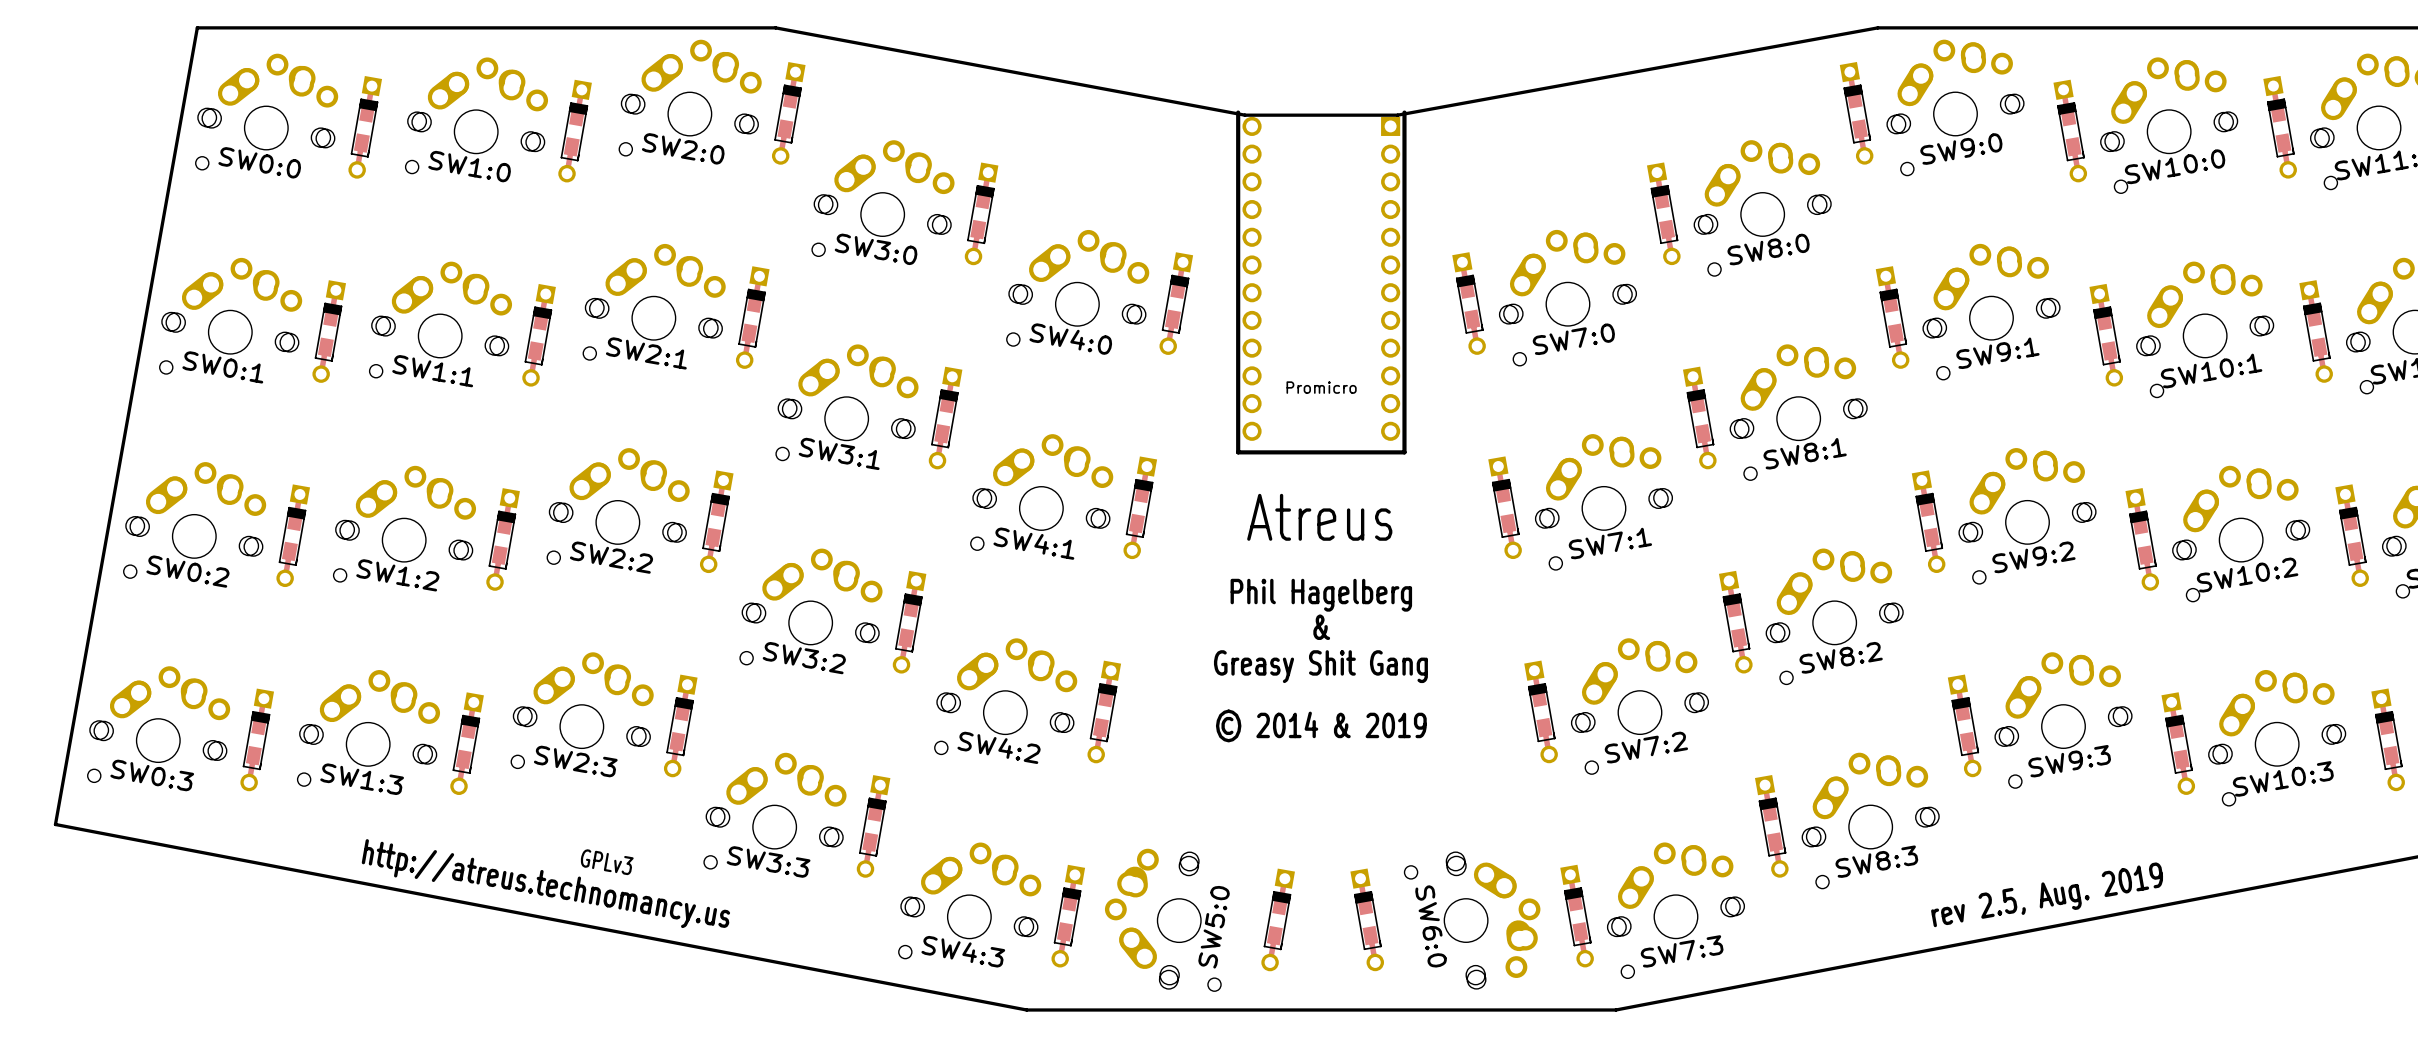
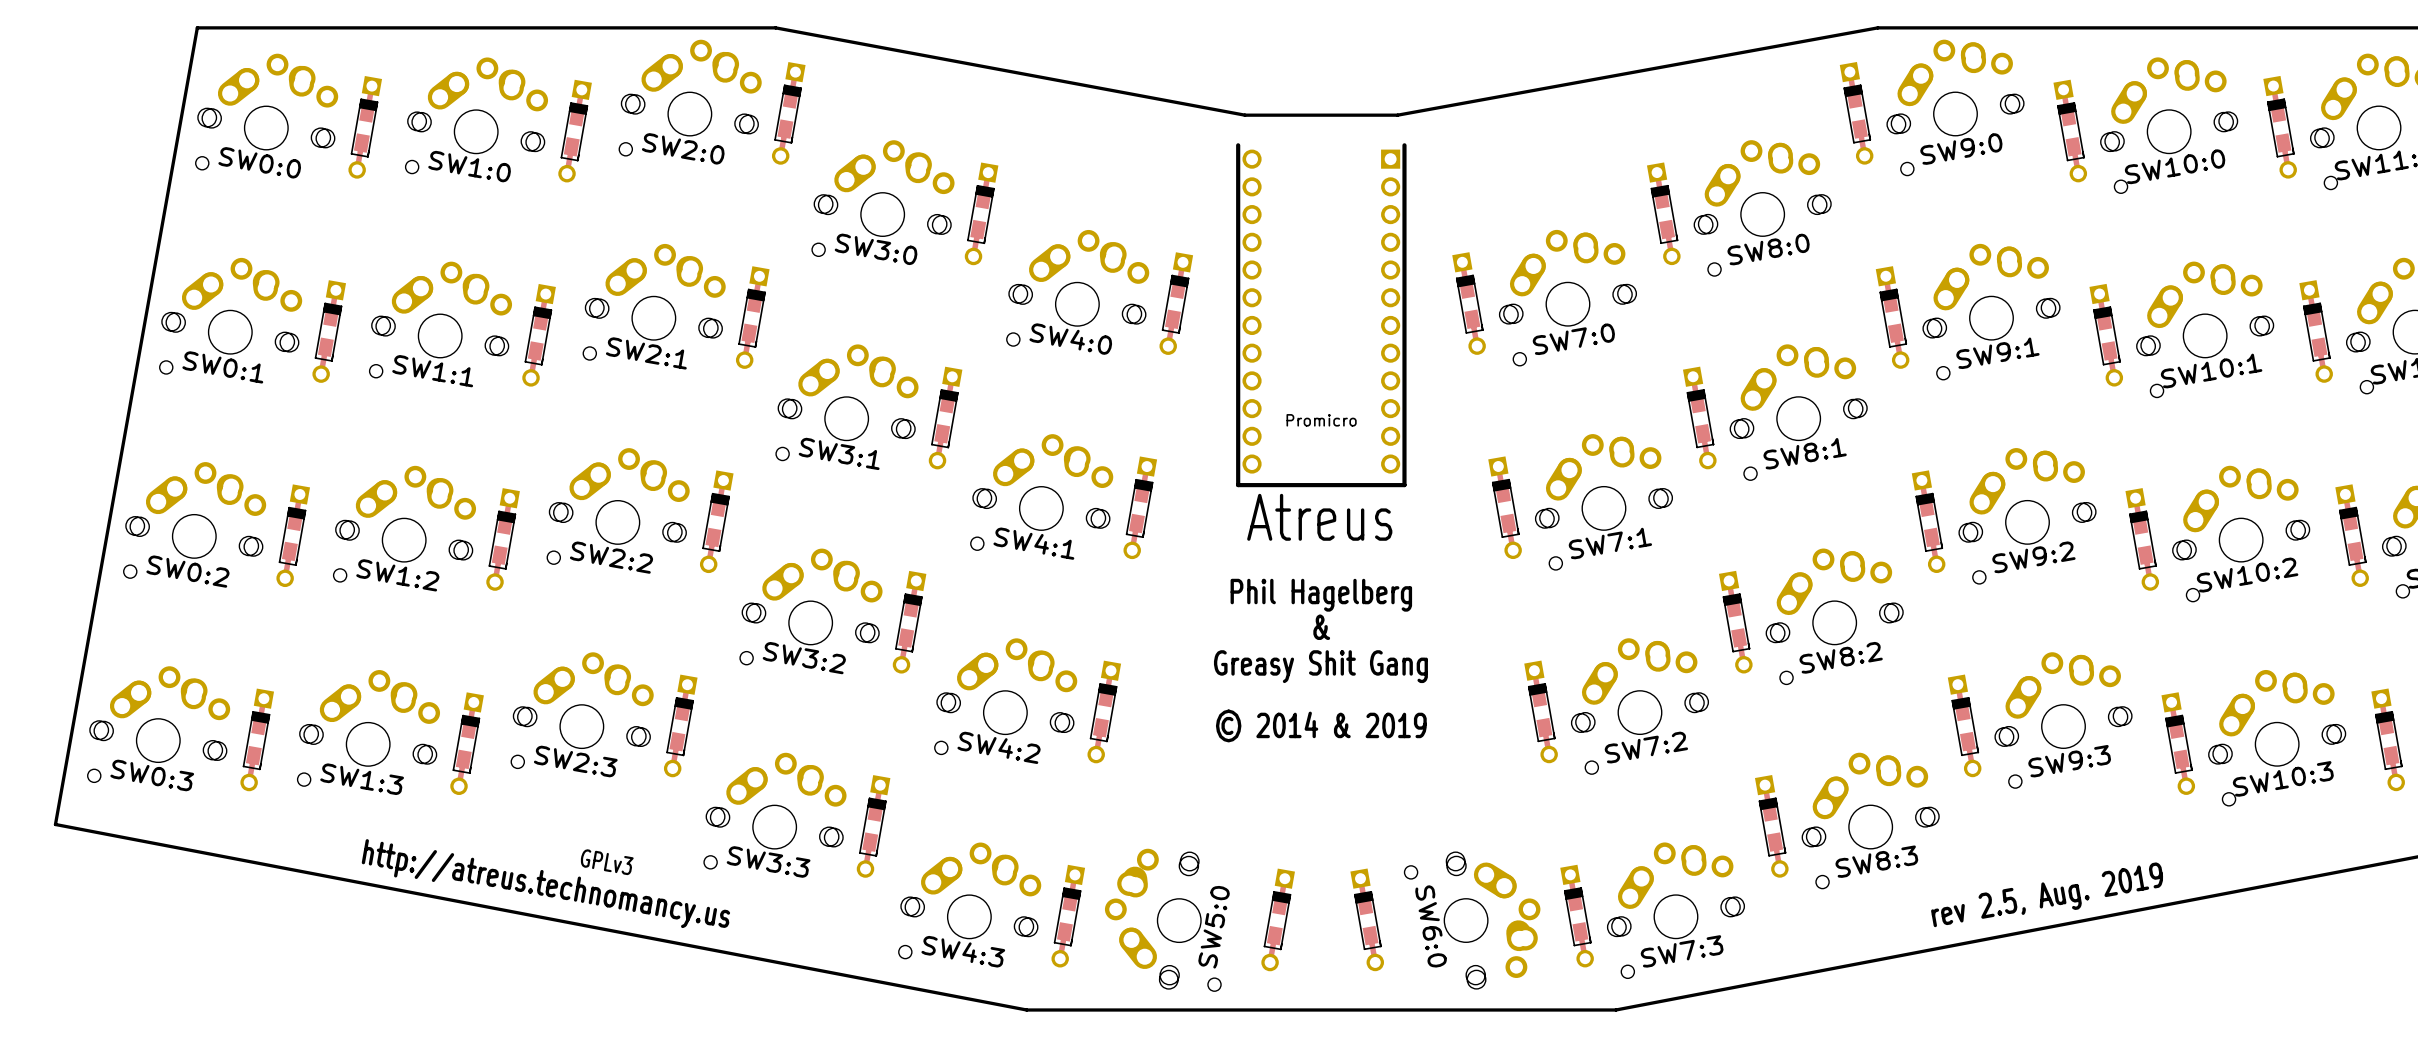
Promicro position: (1321, 282) -> (1321, 315)

